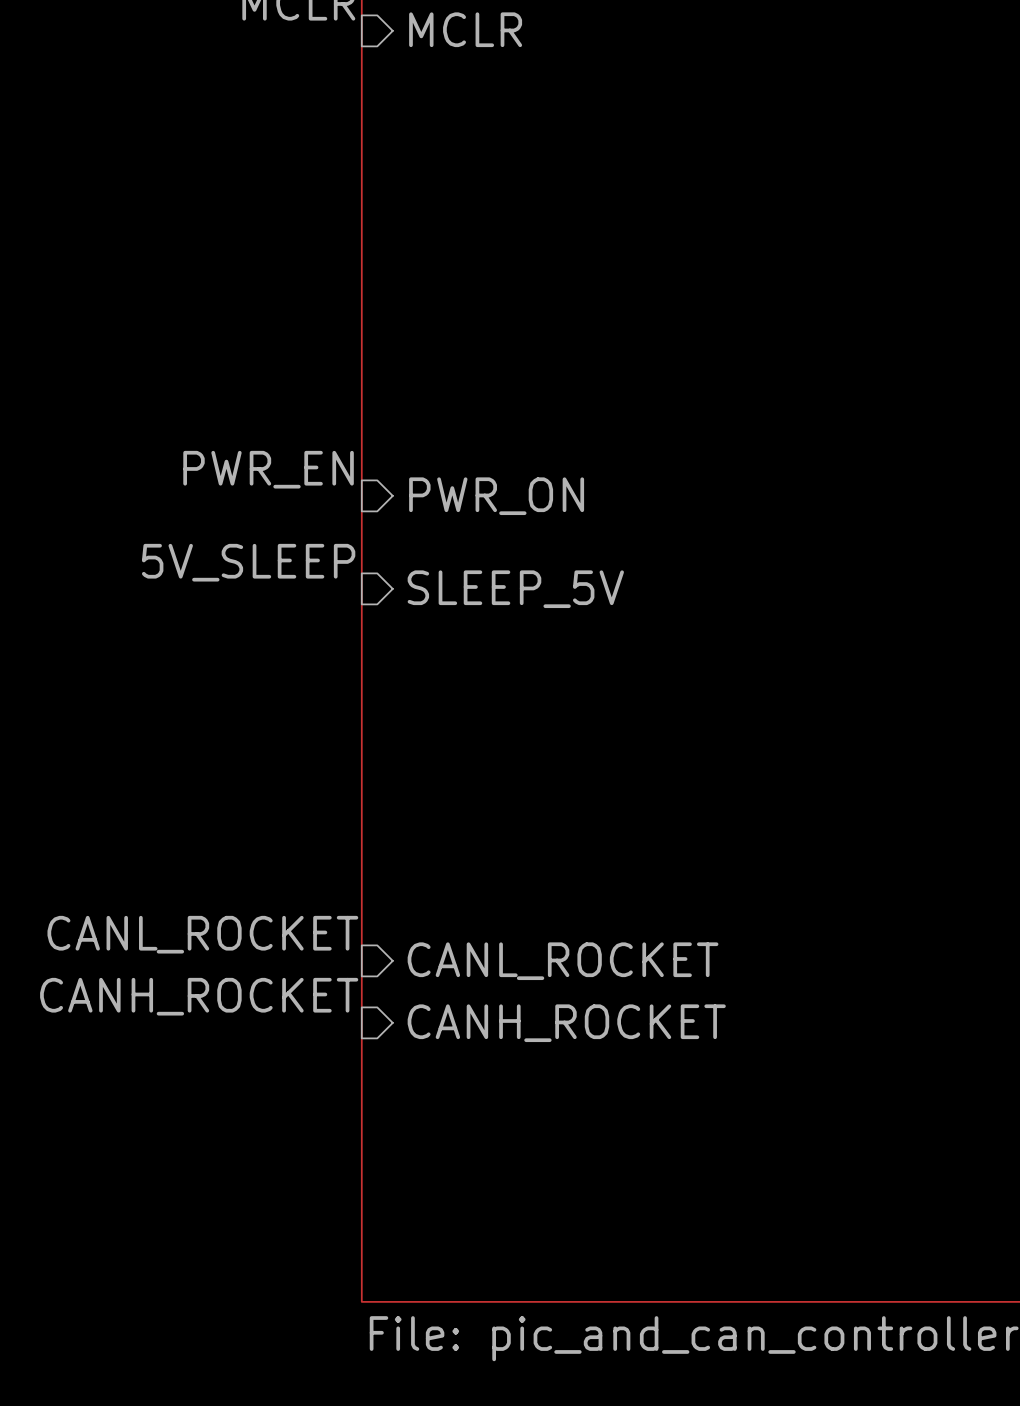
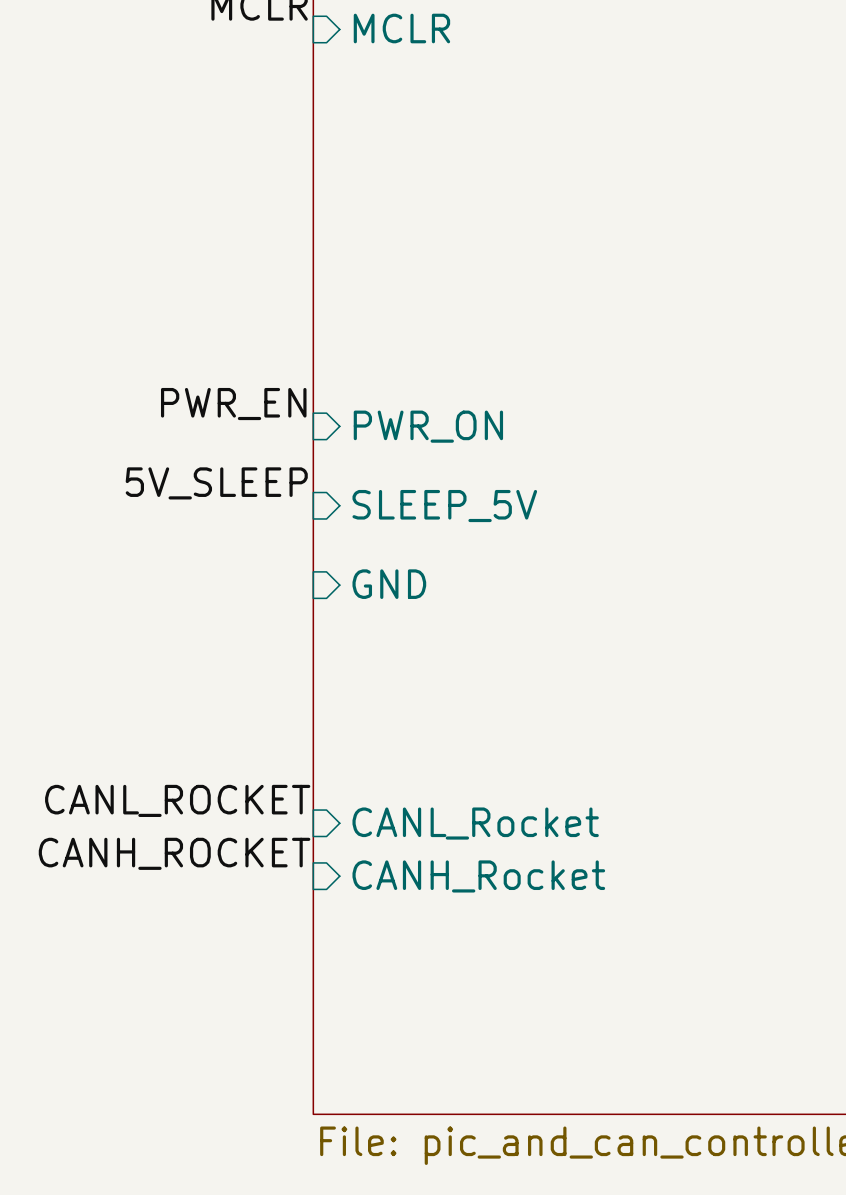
sheet pin: none -> GND (389, 584)
sheet pin: CANL_ROCKET (563, 961) -> CANL_Rocket (475, 823)
sheet pin: CANH_ROCKET (566, 1023) -> CANH_Rocket (478, 876)

